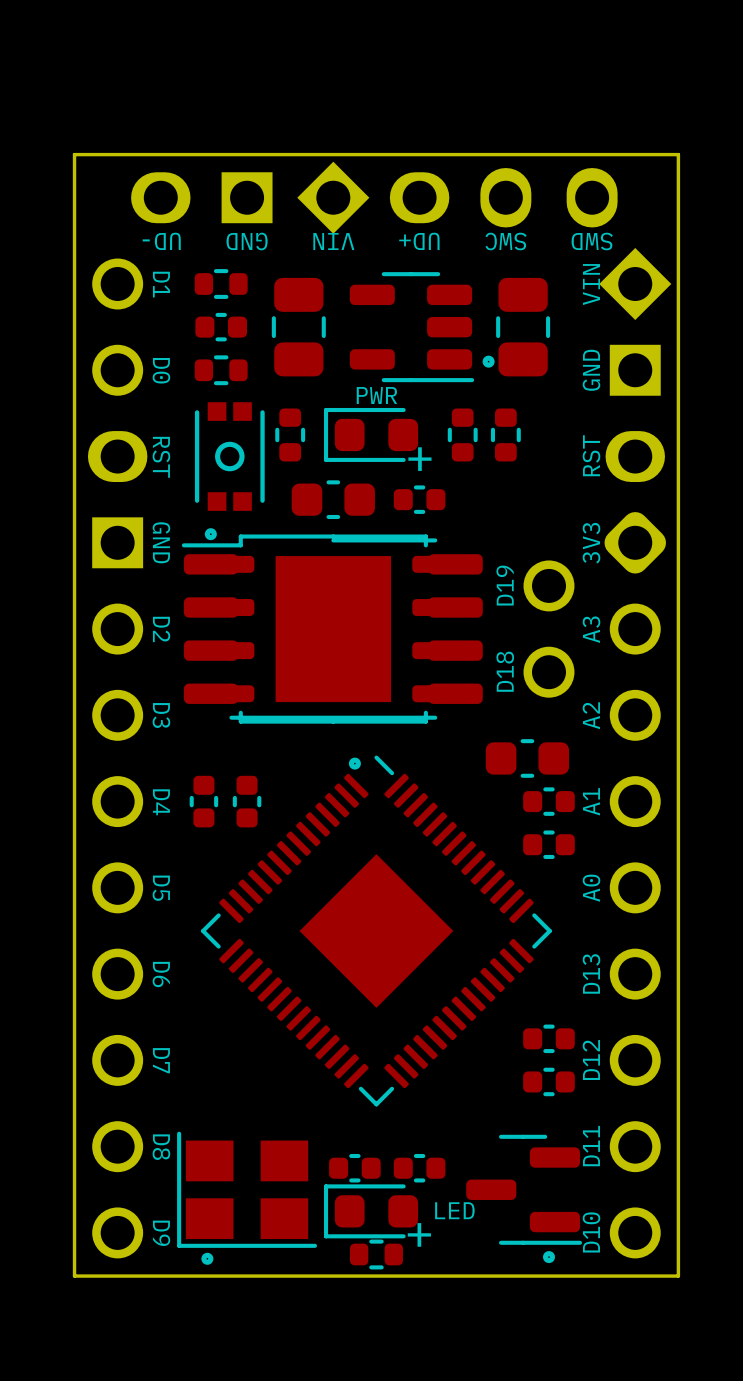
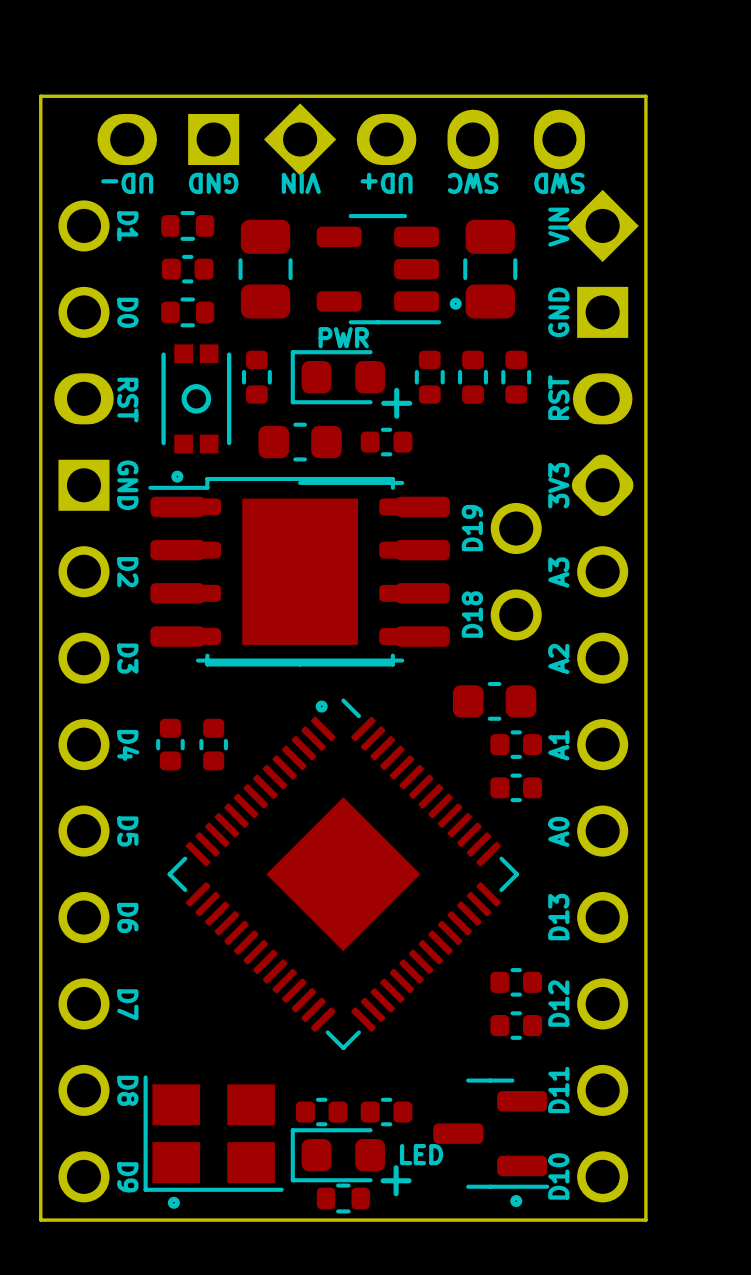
part: none -> (516, 377)

